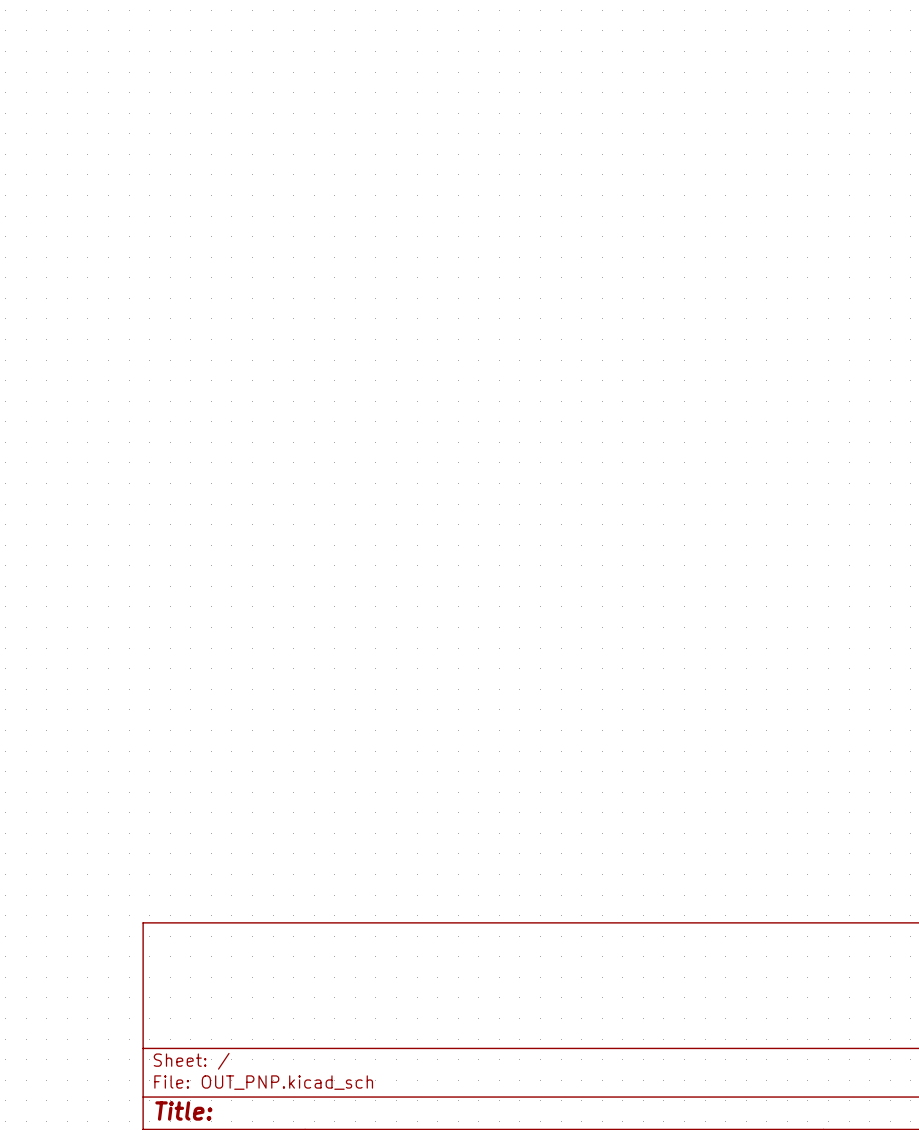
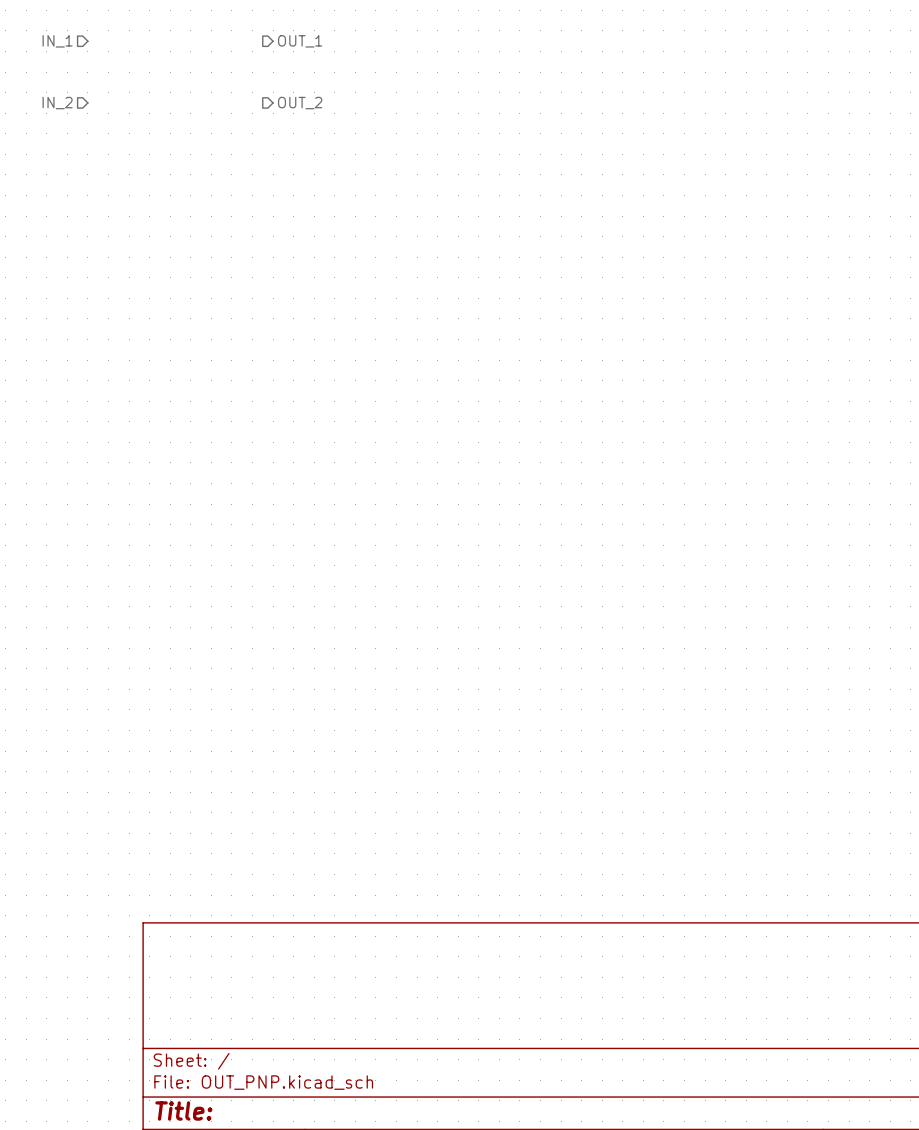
hierarchical label: none -> IN_1 (57, 41)
hierarchical label: none -> OUT_1 (300, 41)
hierarchical label: none -> IN_2 (57, 103)
hierarchical label: none -> OUT_2 (300, 103)

